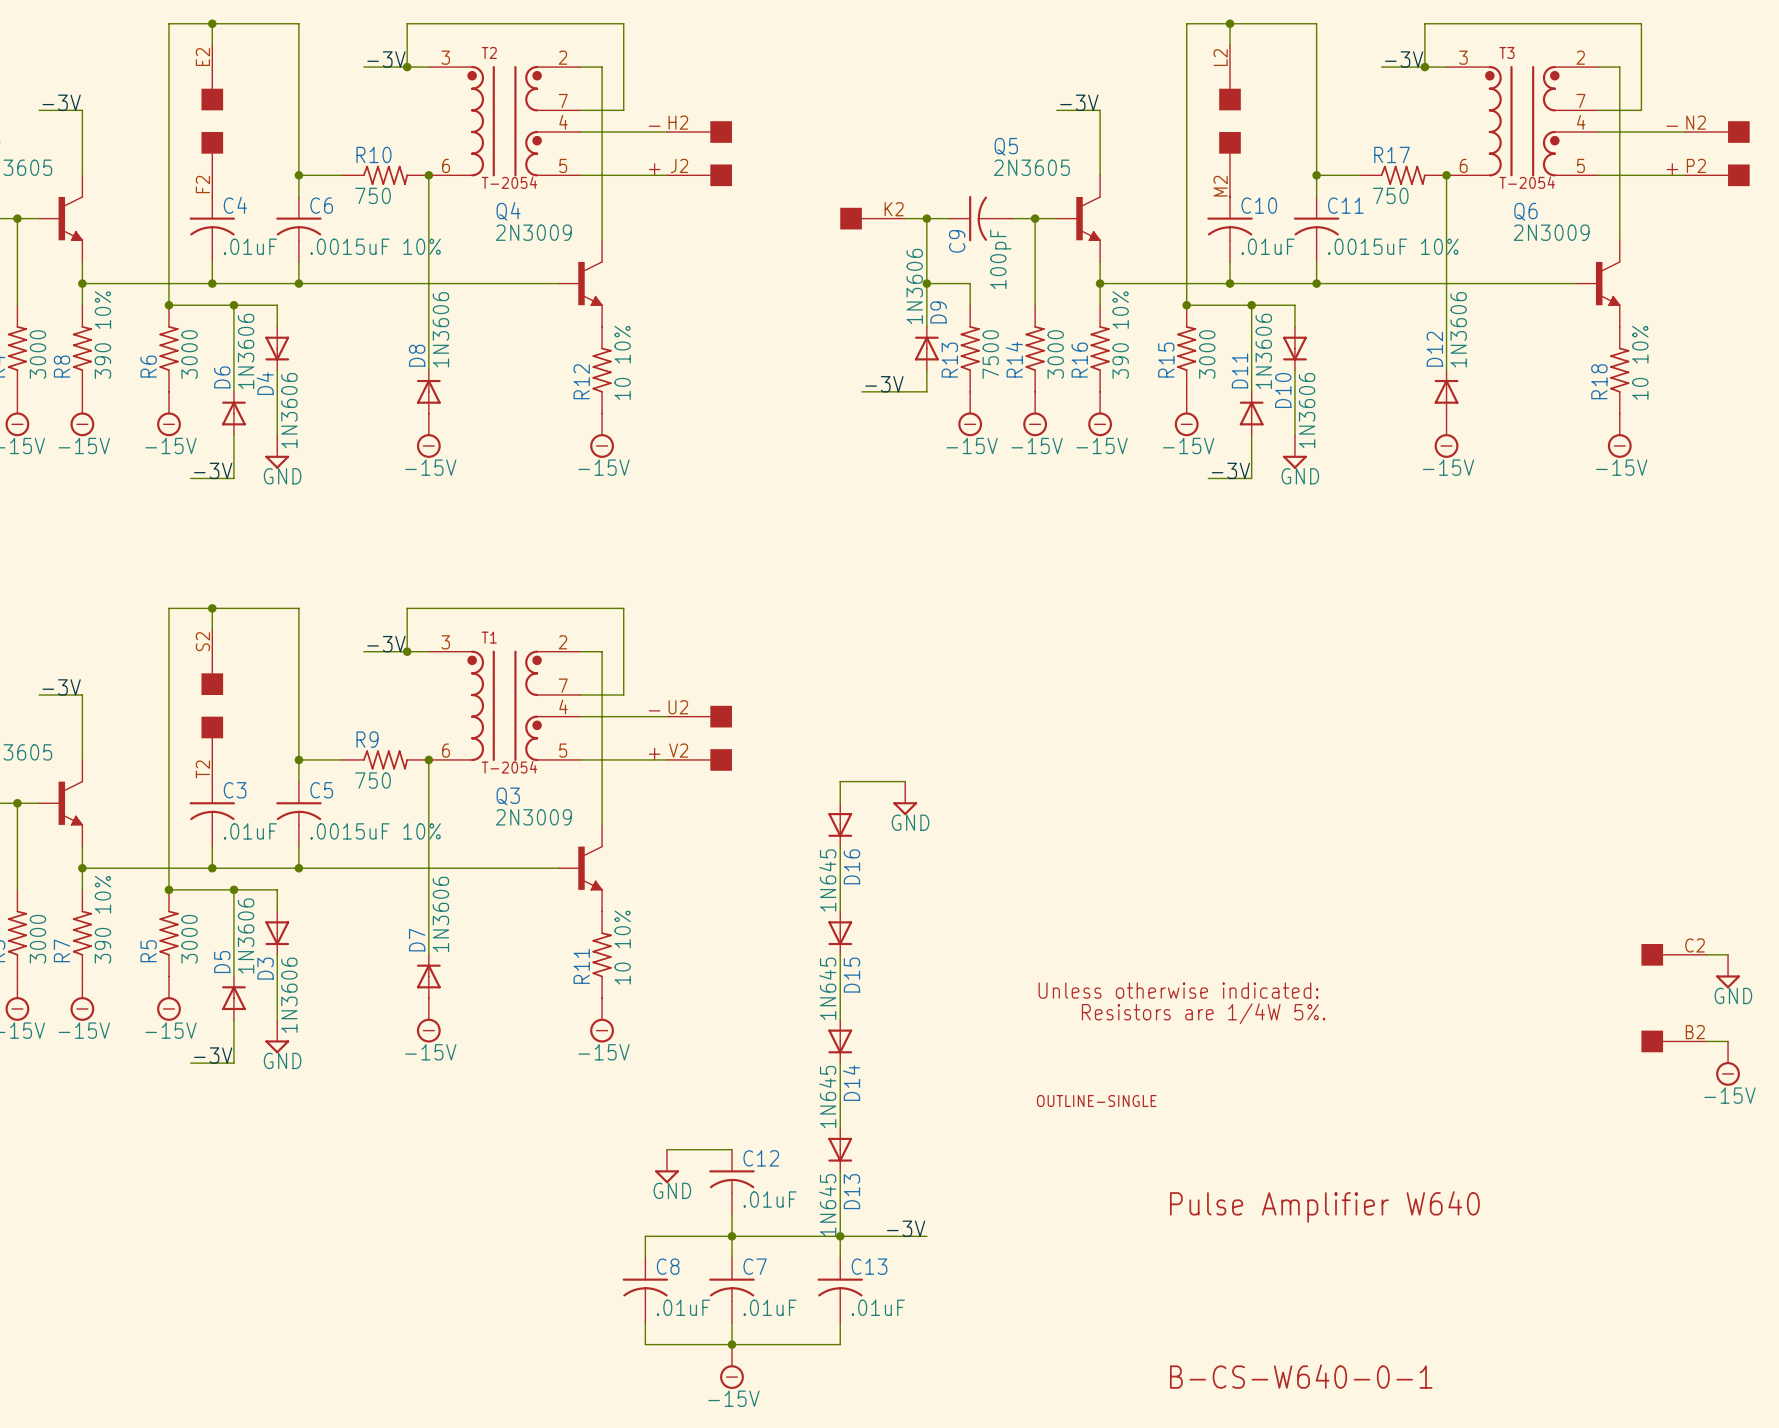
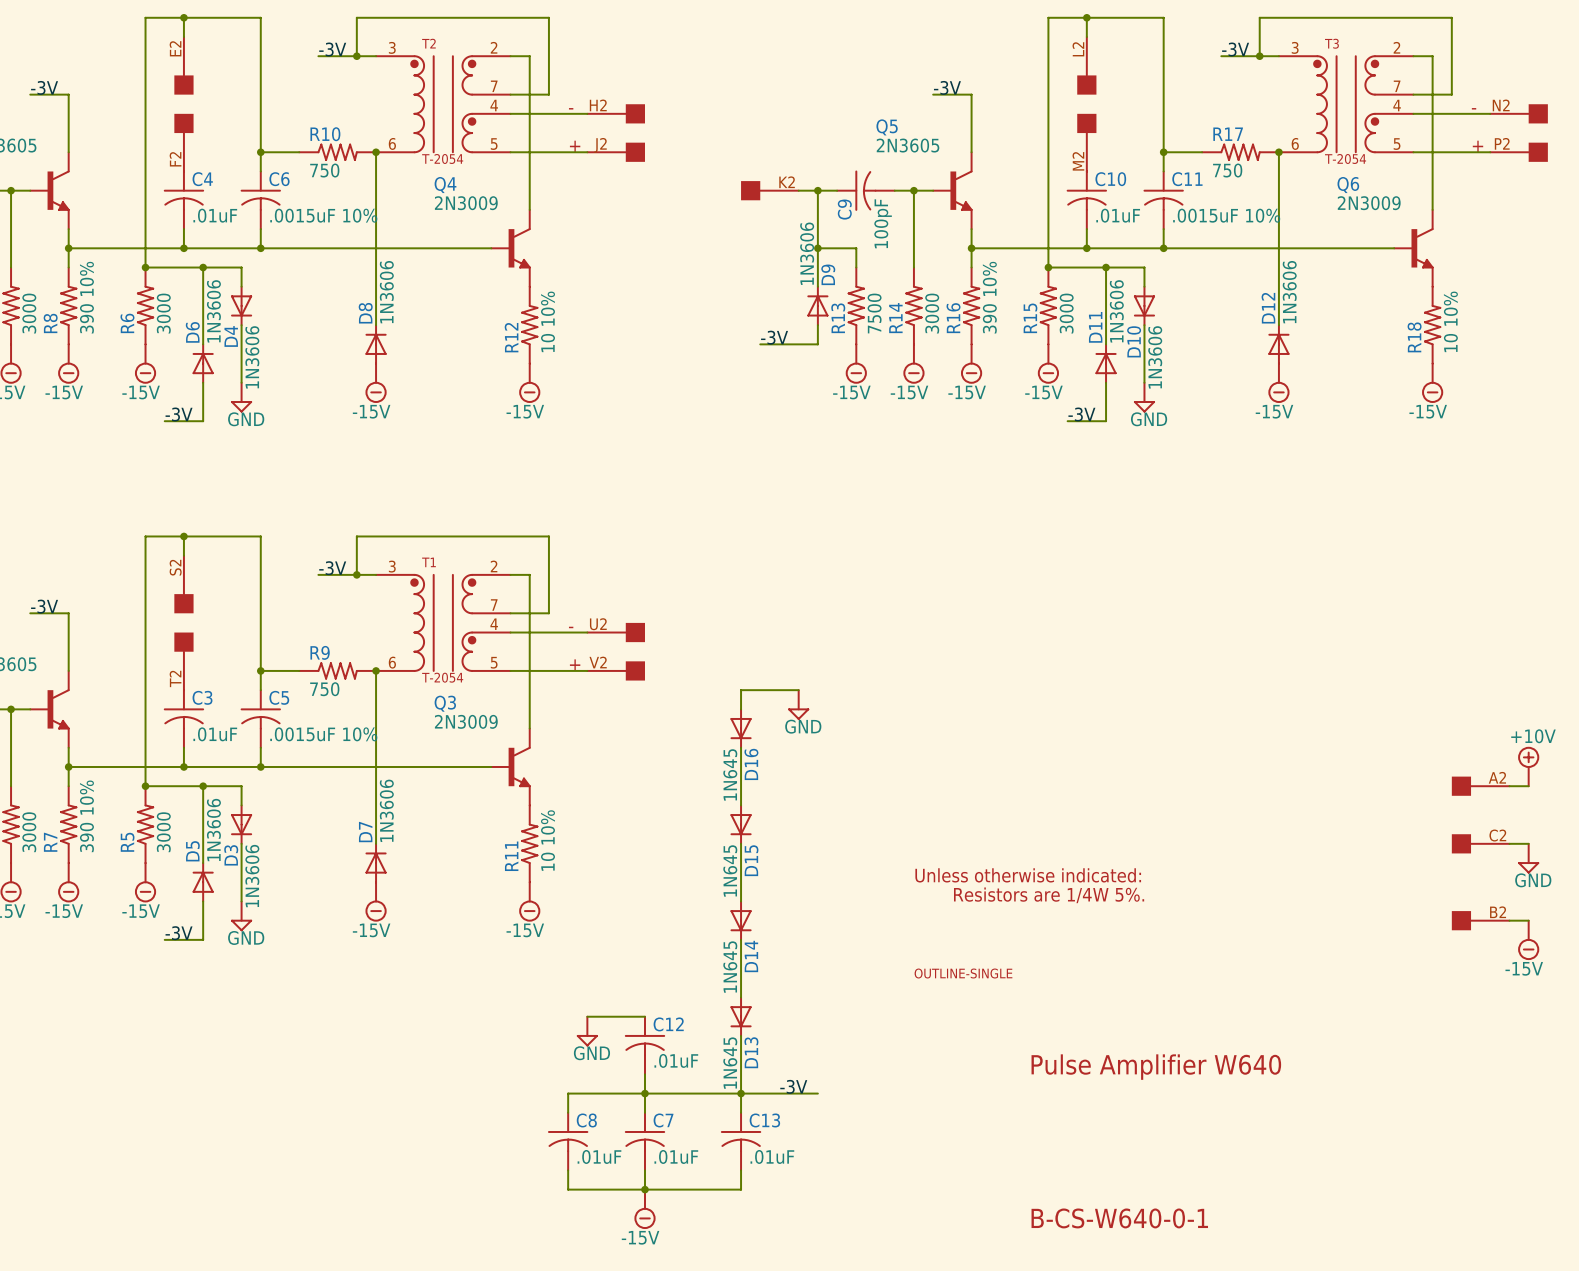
power symbol: none -> +10V (1528, 766)
part: none -> (1480, 786)
wire: none -> (1509, 786) (1528, 786)

